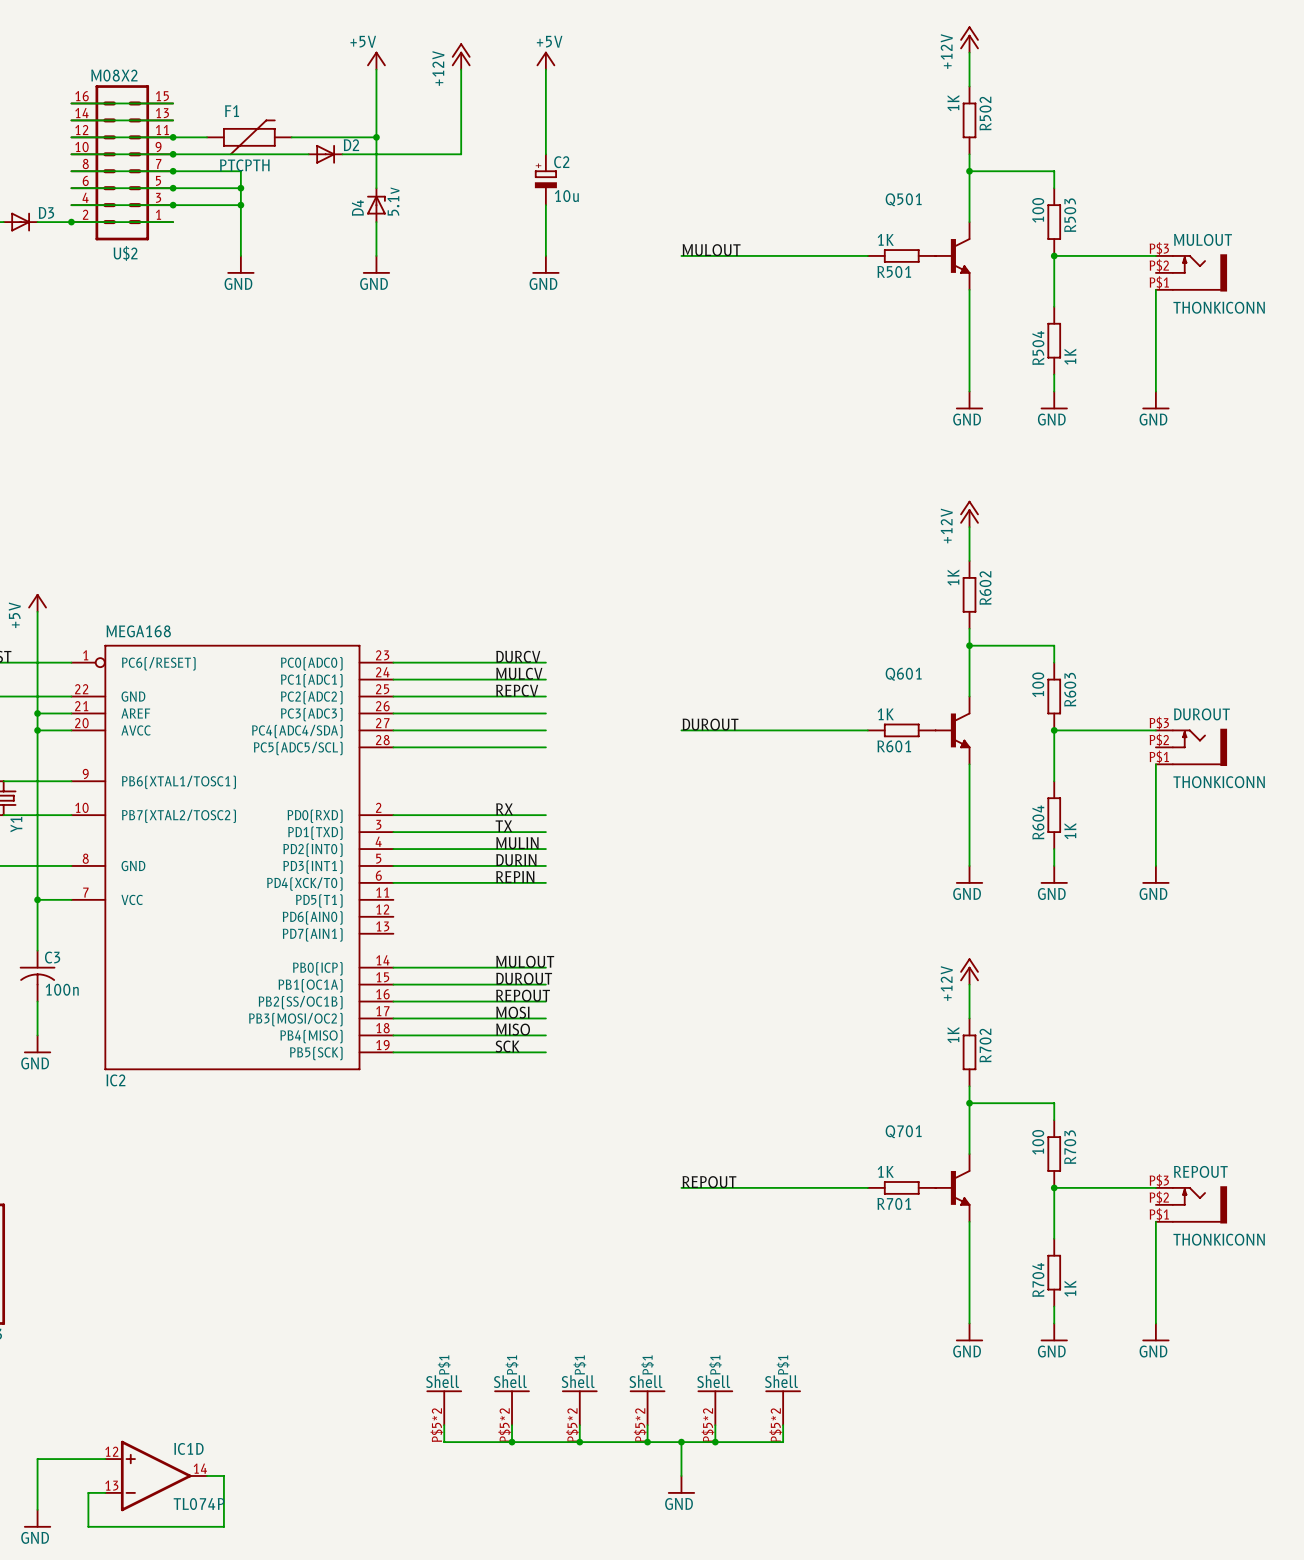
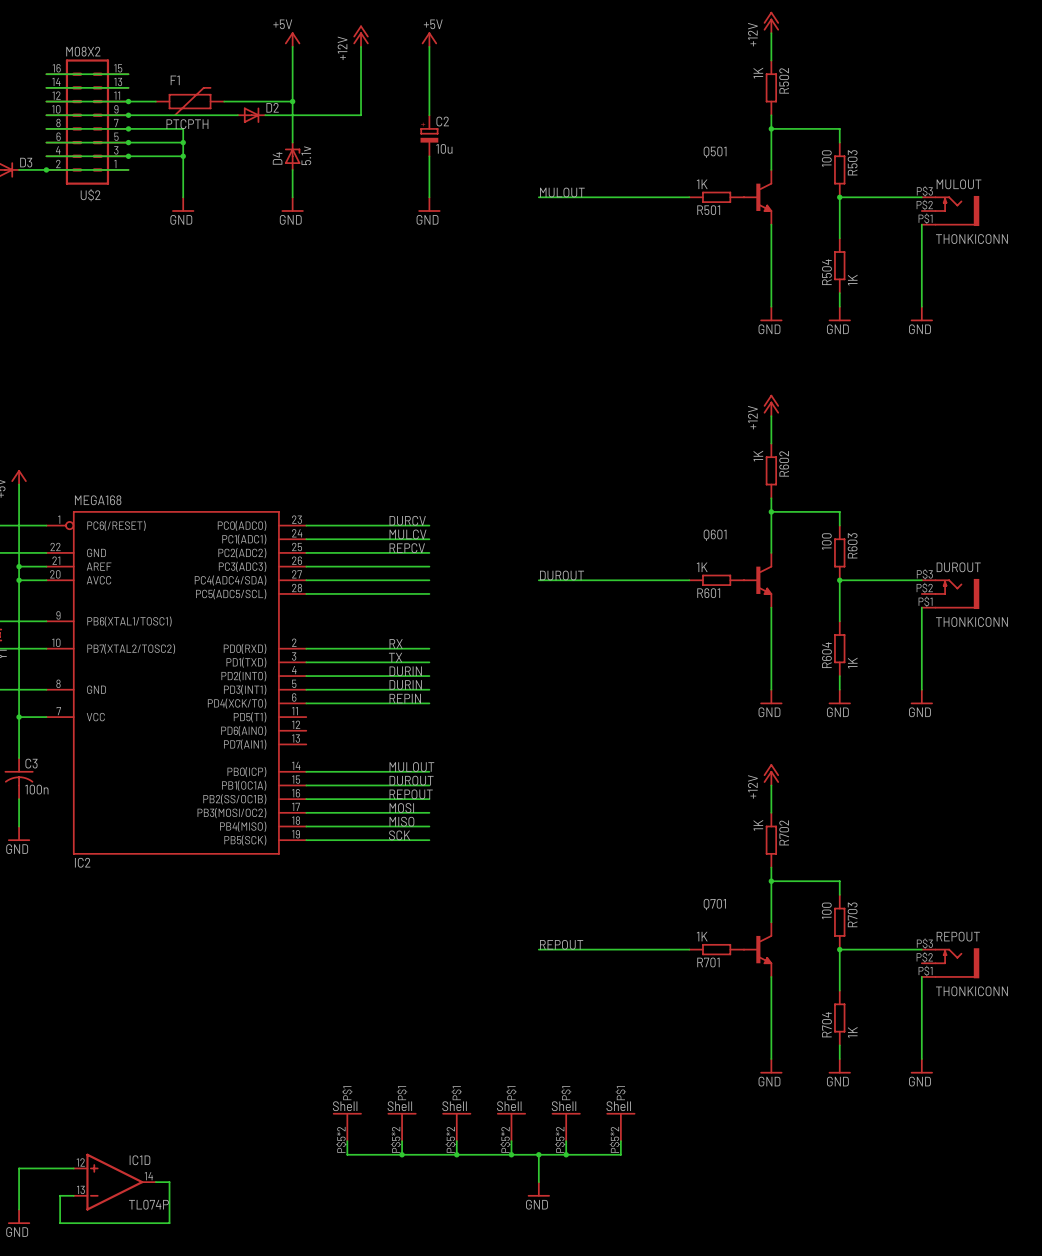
label: MULIN (517, 843) -> DURIN (405, 671)

